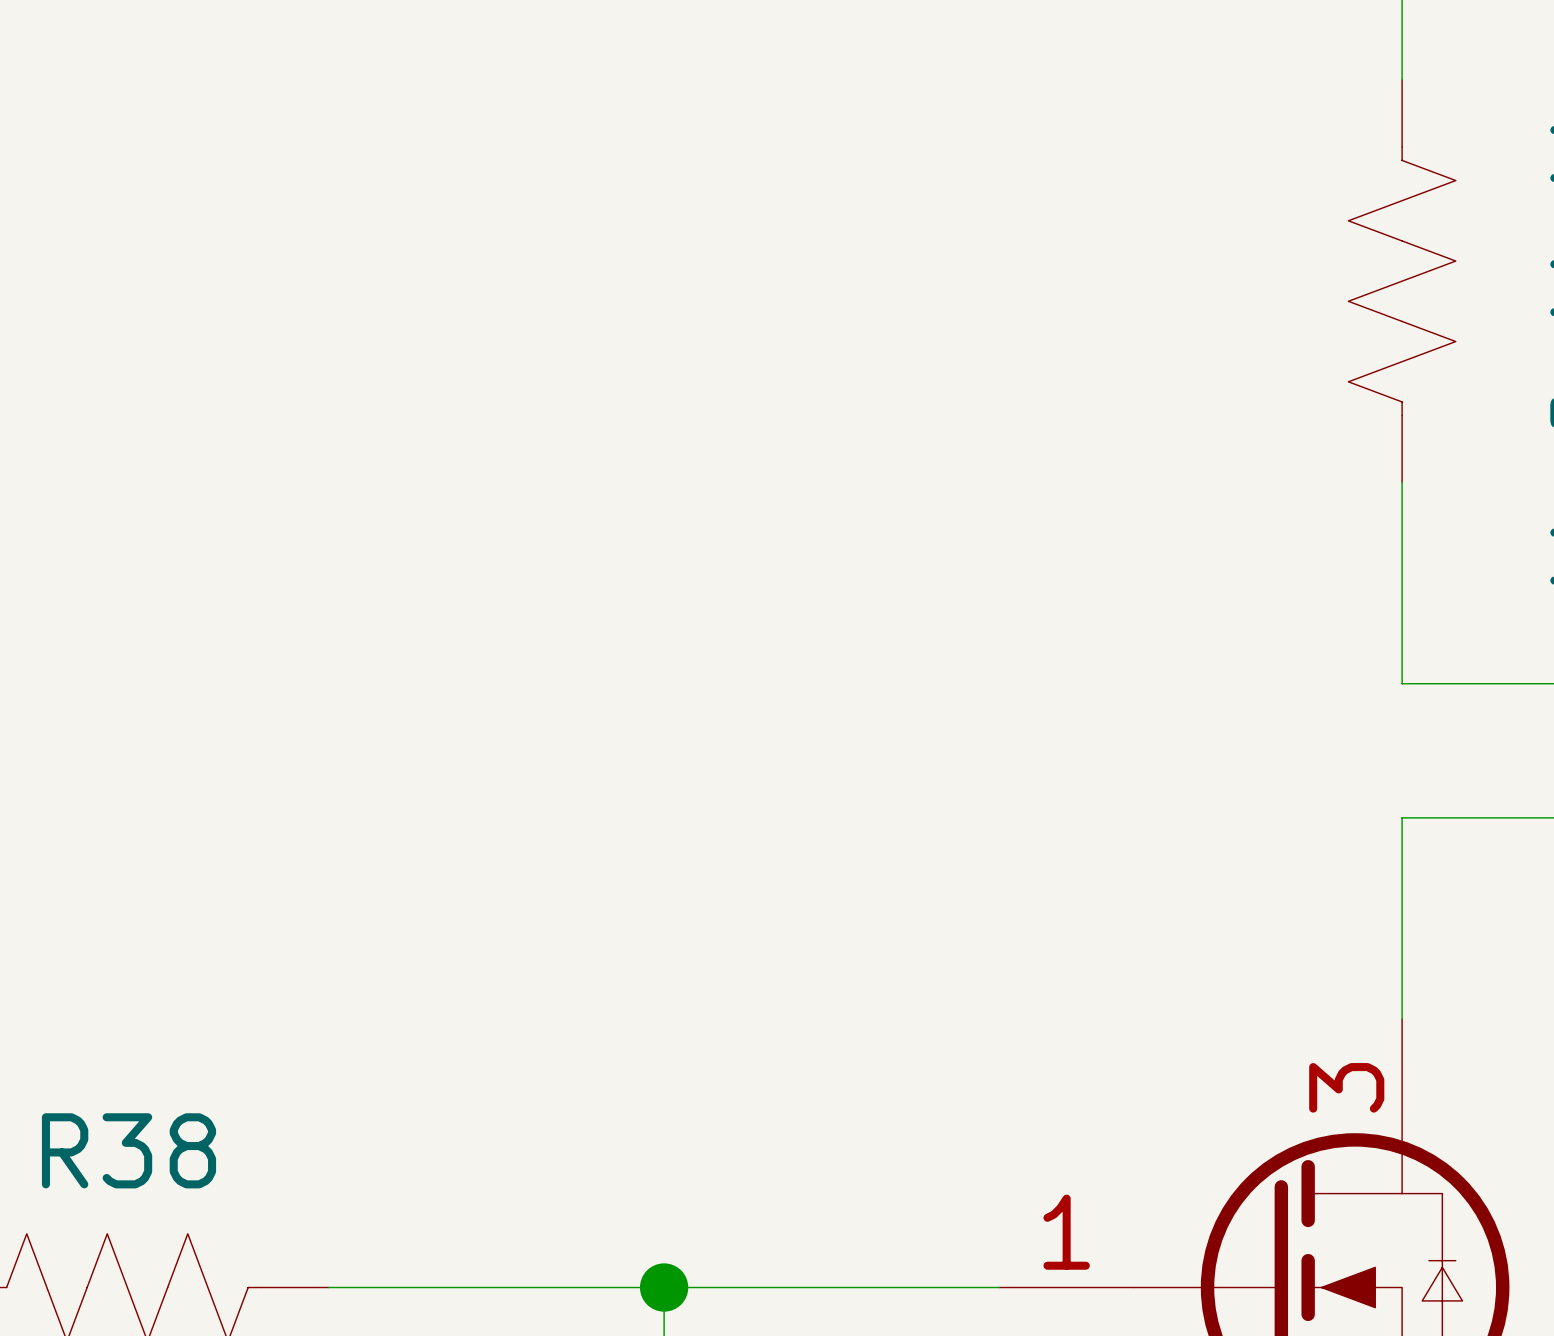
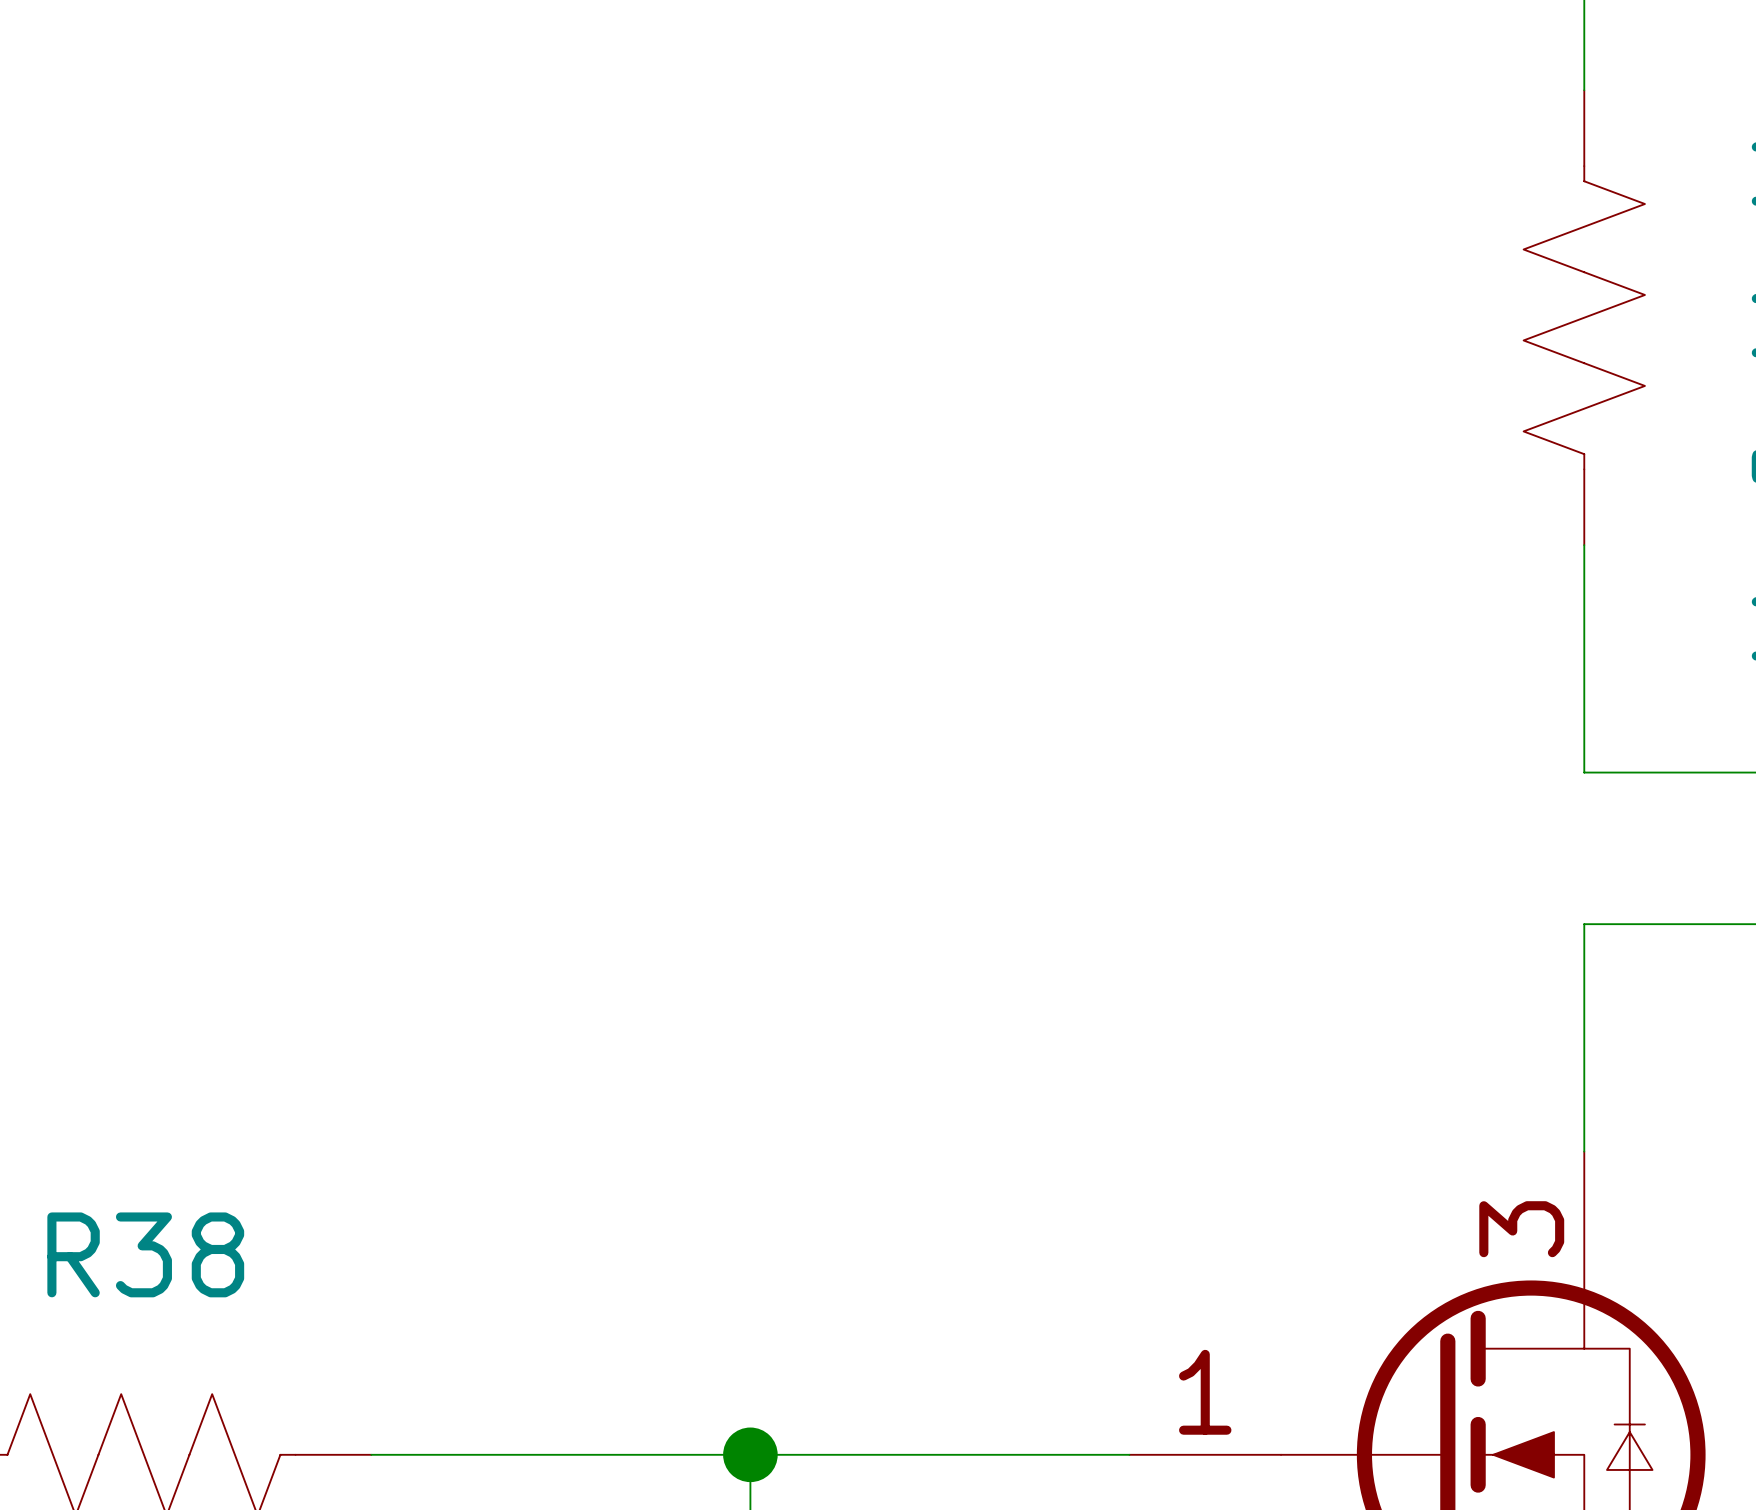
R38 name position: R38 (128, 1150) -> R38 (145, 1254)

